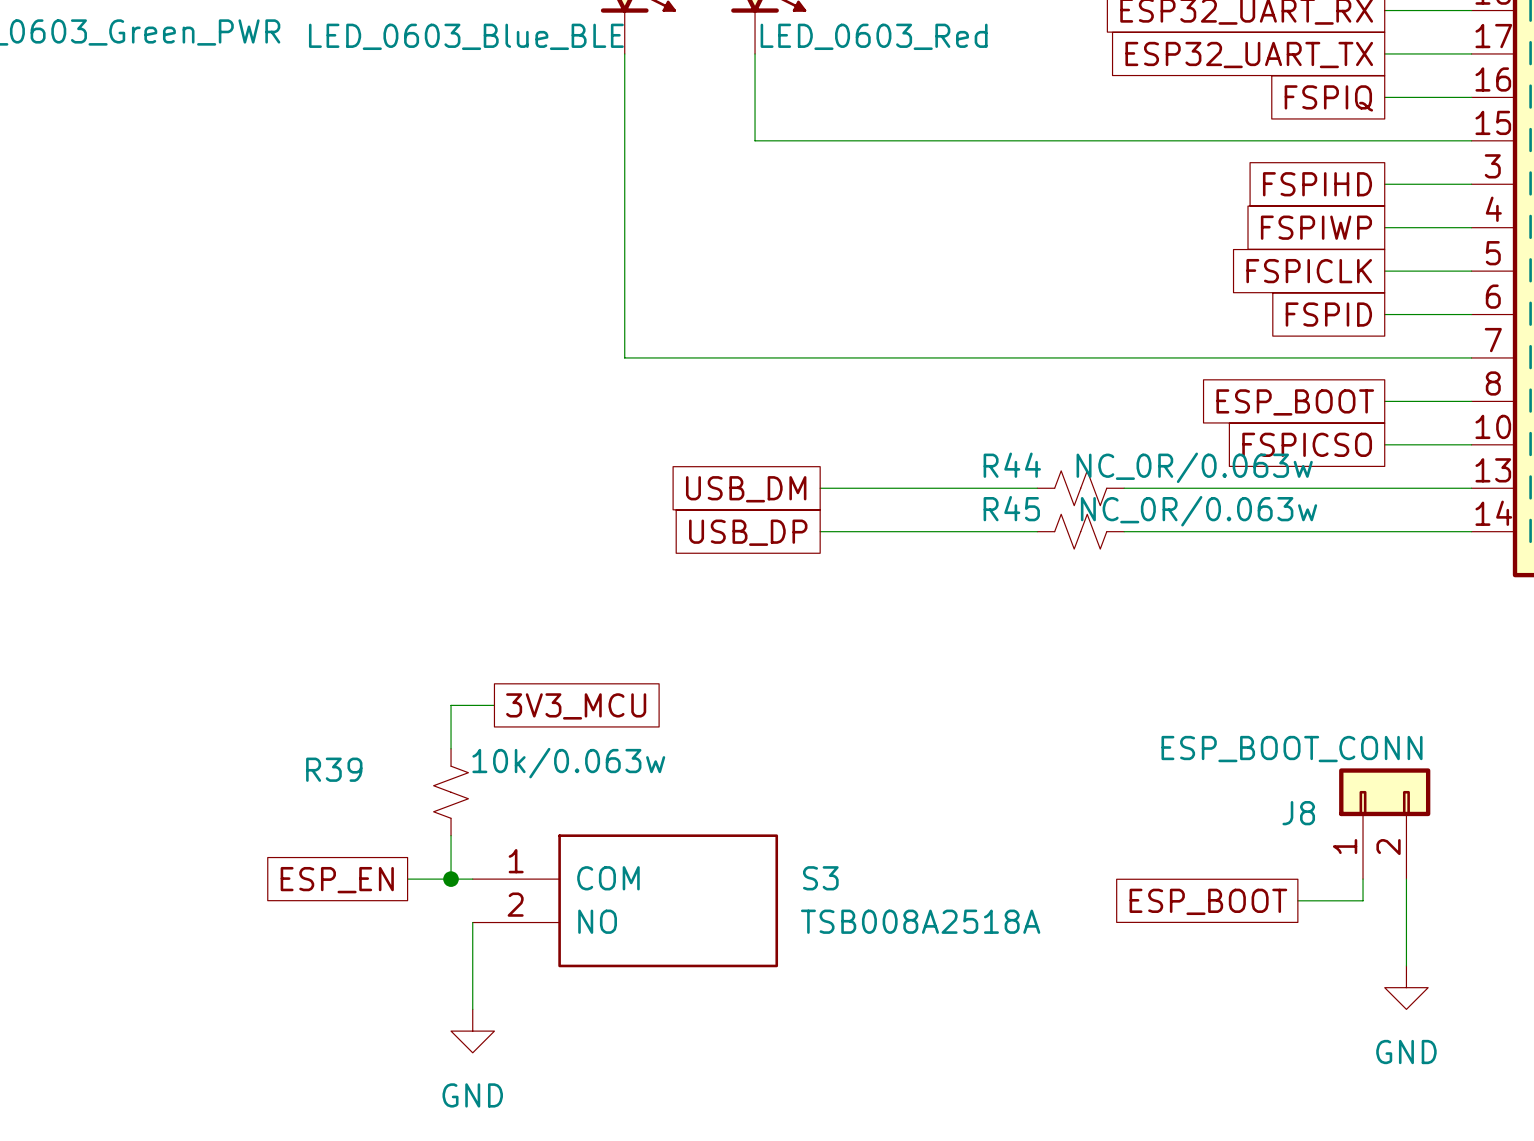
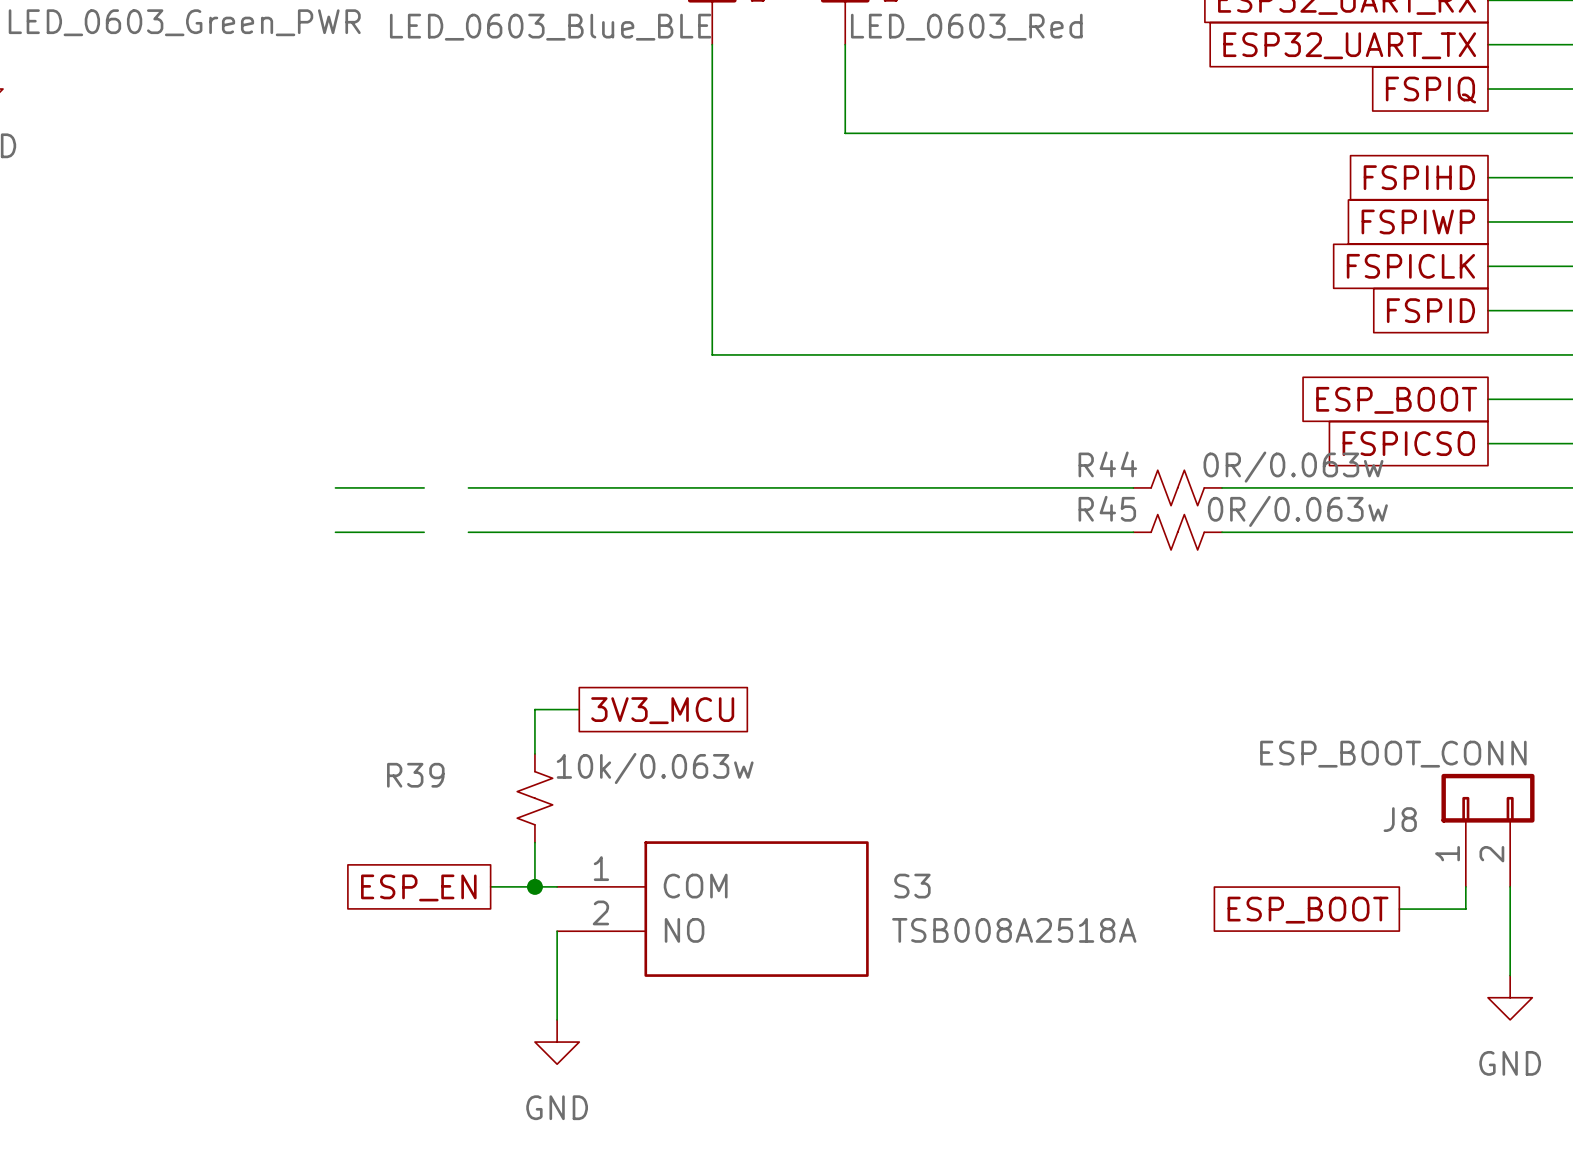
R44 value: NC_0R/0.063w (1194, 467) -> 0R/0.063w (1293, 467)
wire: none -> (335, 487) (424, 487)
wire: none -> (468, 487) (911, 487)
global label: USB_DM (746, 489) -> none
R45 value: NC_0R/0.063w (1199, 511) -> 0R/0.063w (1297, 511)
wire: none -> (335, 532) (424, 532)
wire: none -> (468, 532) (911, 532)
global label: USB_DP (748, 532) -> none

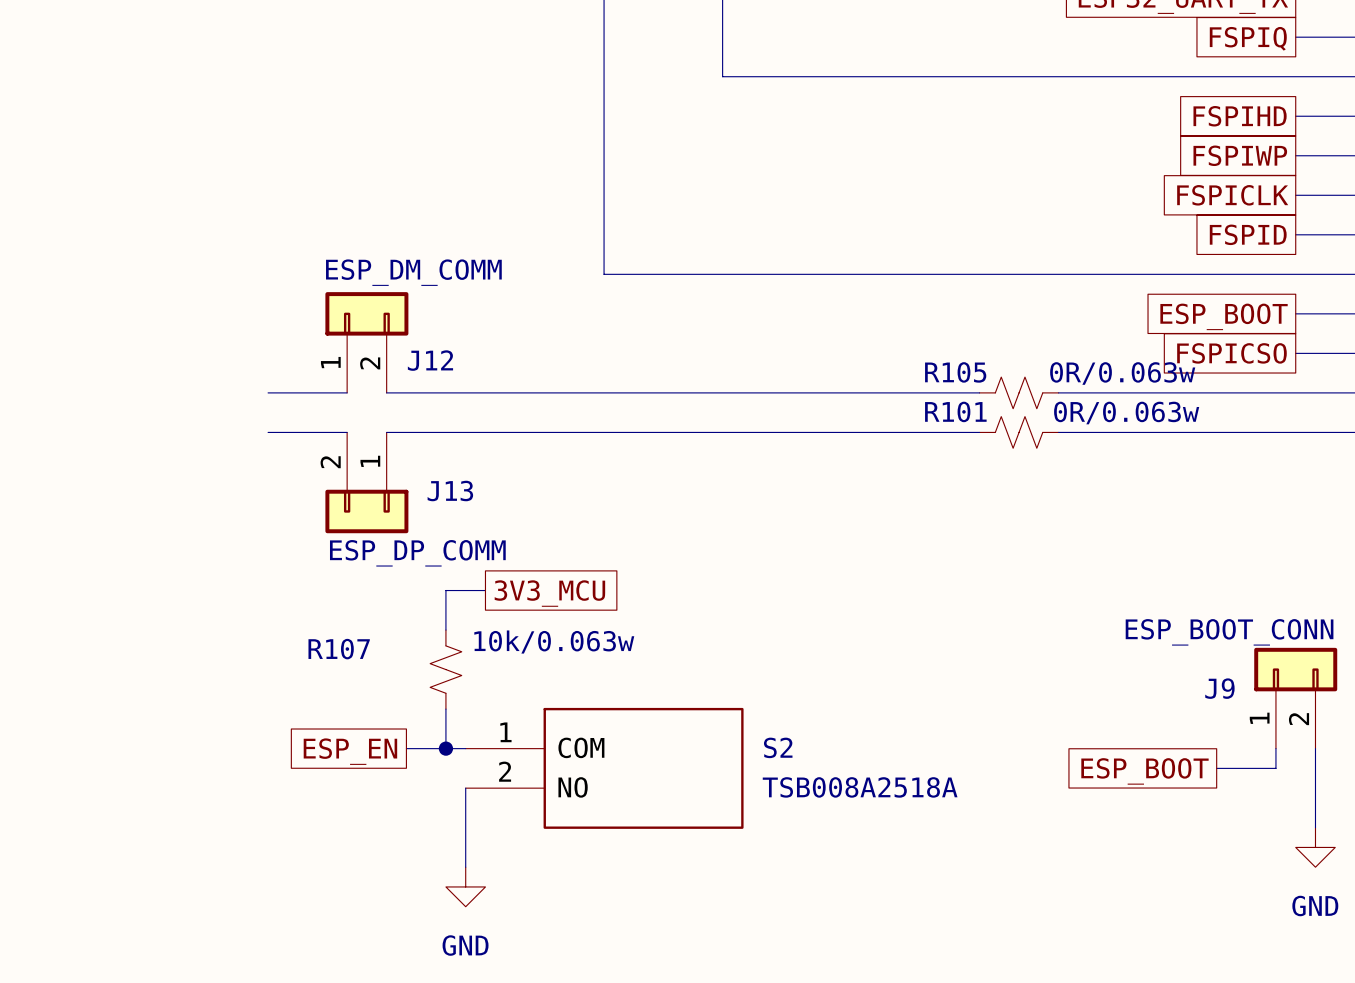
J12: none -> ESP_DM_COMM (366, 342)
R44 name: R44 (1107, 464) -> R105 (955, 372)
R45 name: R45 (1107, 508) -> R101 (955, 411)
J13: none -> ESP_DP_COMM (366, 482)
R39 name: R39 (415, 775) -> R107 (339, 649)
J8 name: J8 (1400, 819) -> J9 (1219, 688)
S3 name: S3 (912, 886) -> S2 (778, 747)

